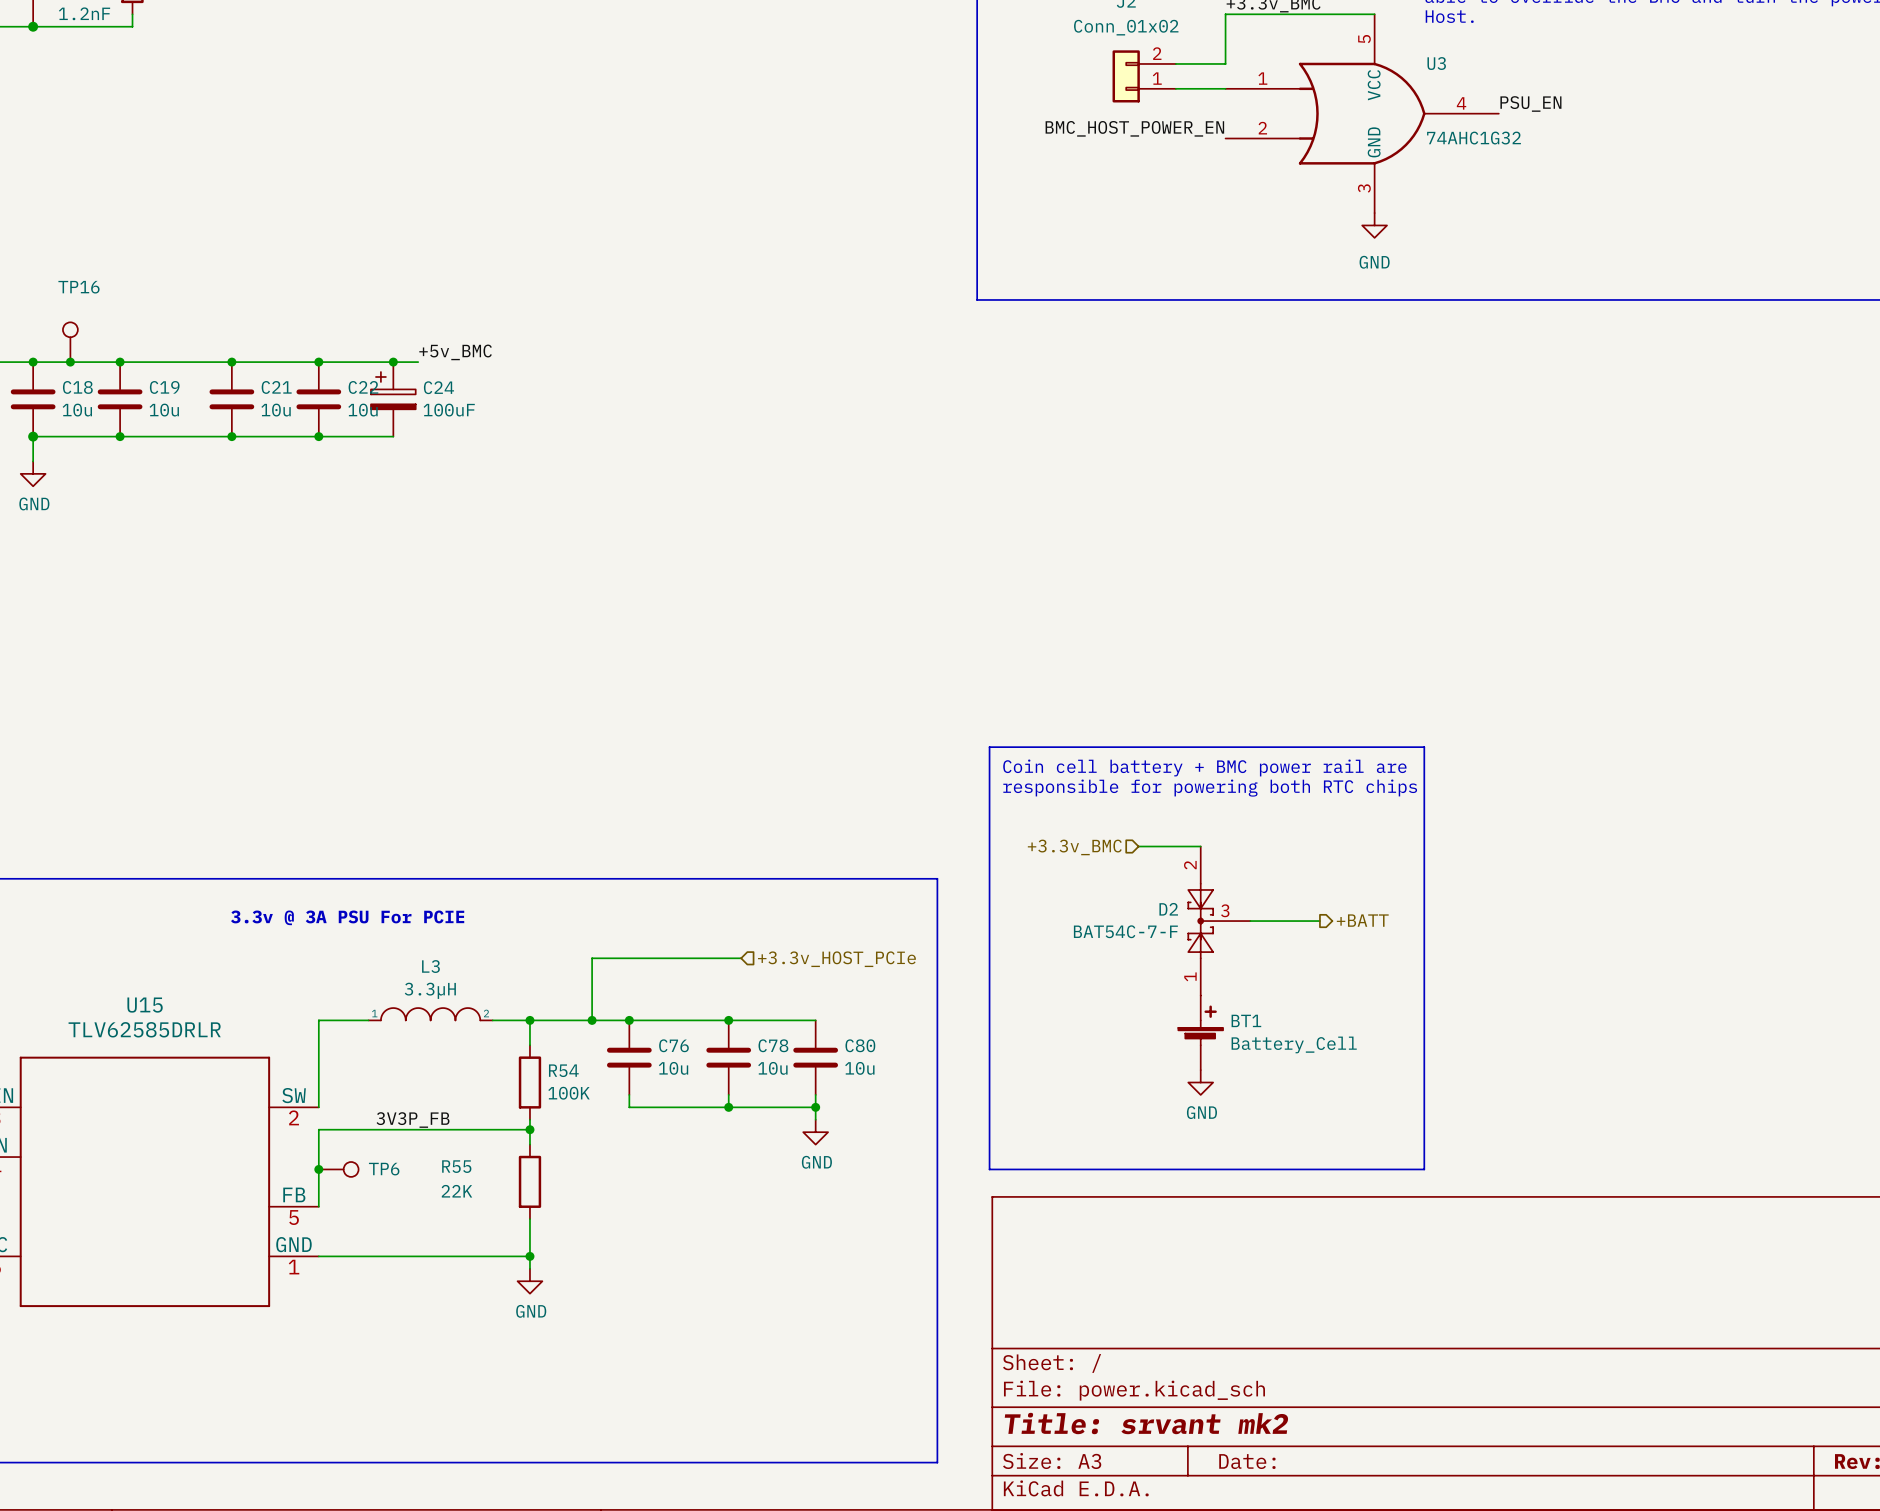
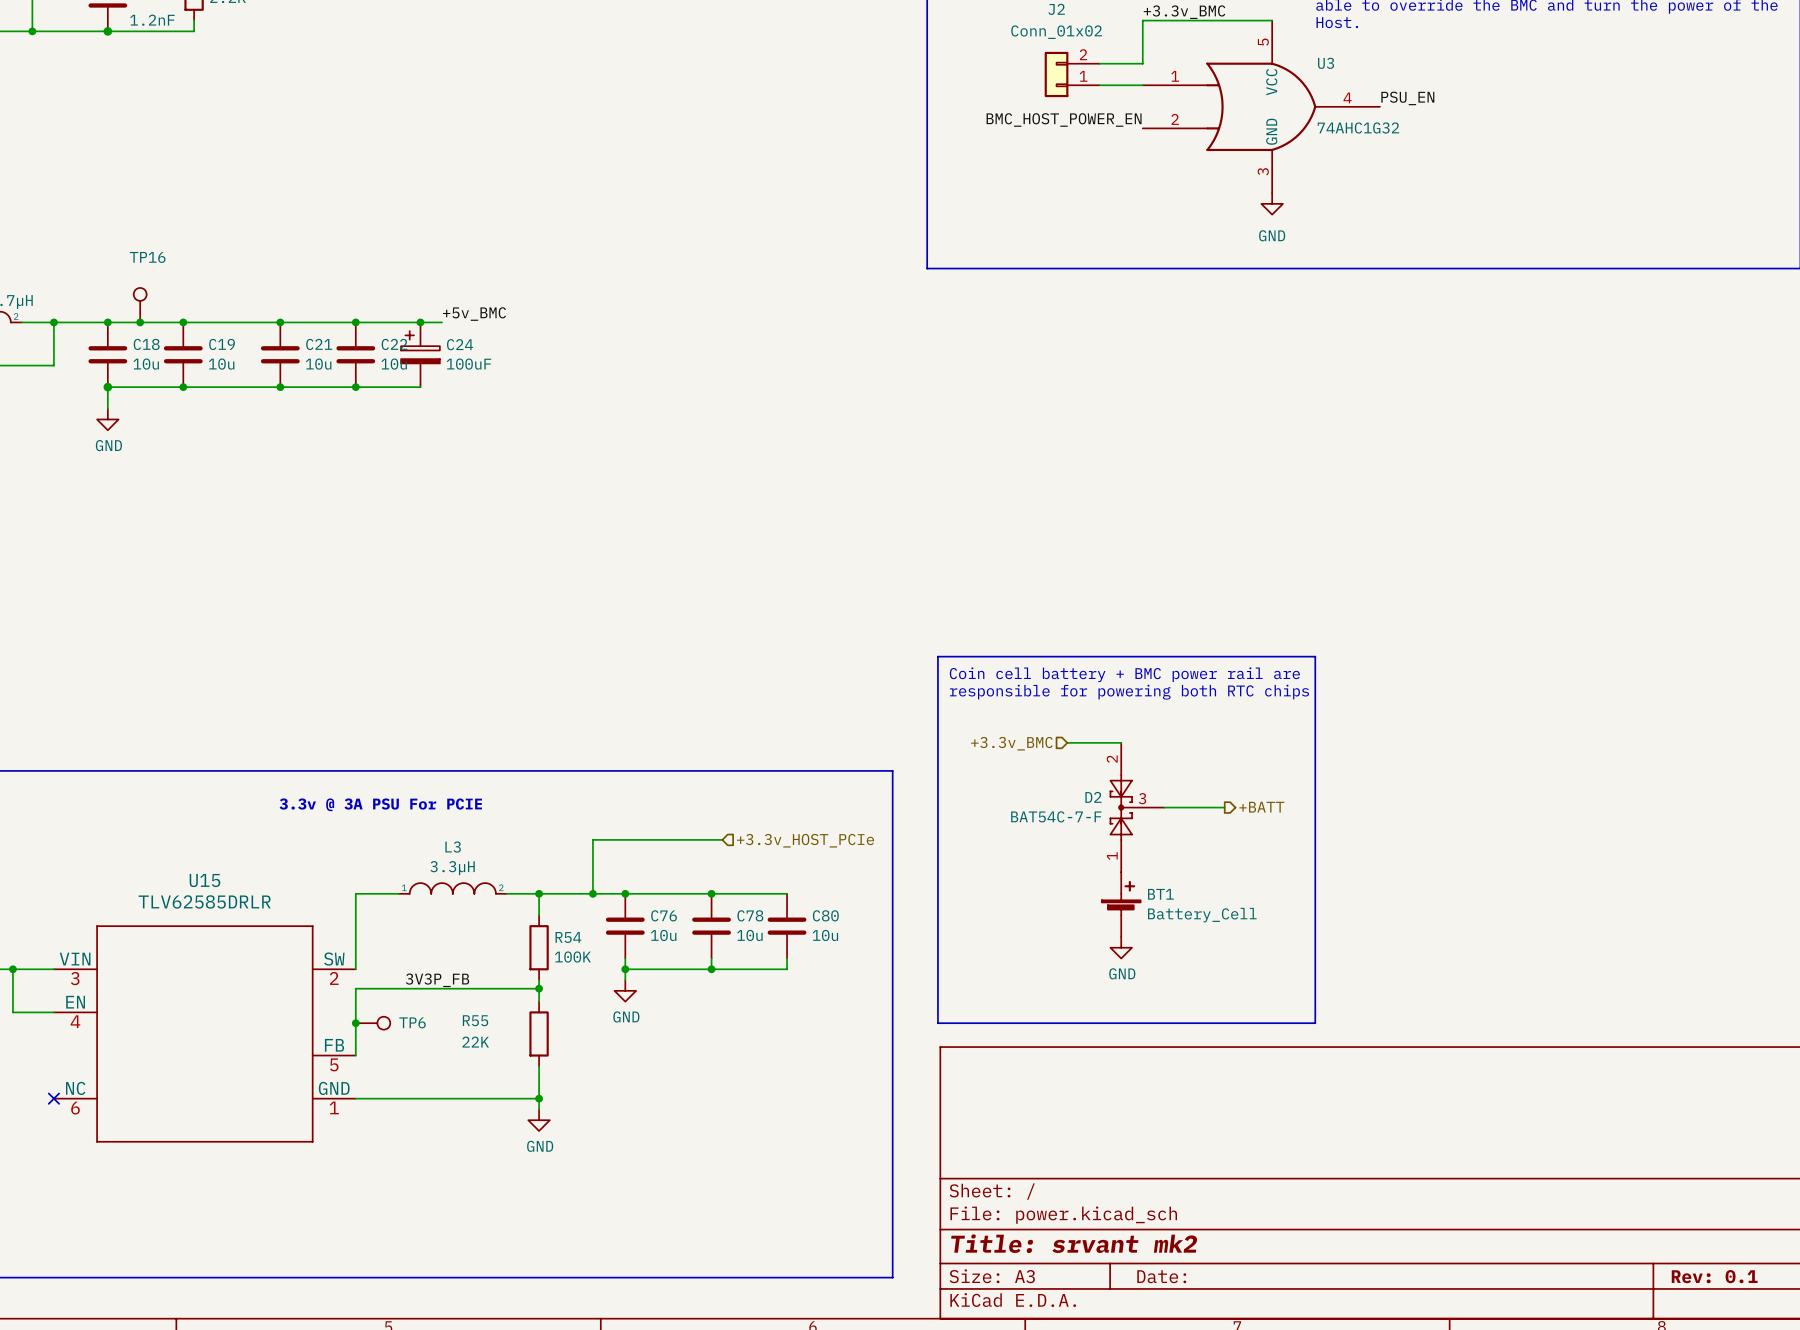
junction: none -> (625, 969)
wire: (815, 1107) (815, 1119) -> (625, 969) (625, 980)
junction: (815, 1107) -> none
power symbol position: GND (815, 1132) -> GND (625, 990)

